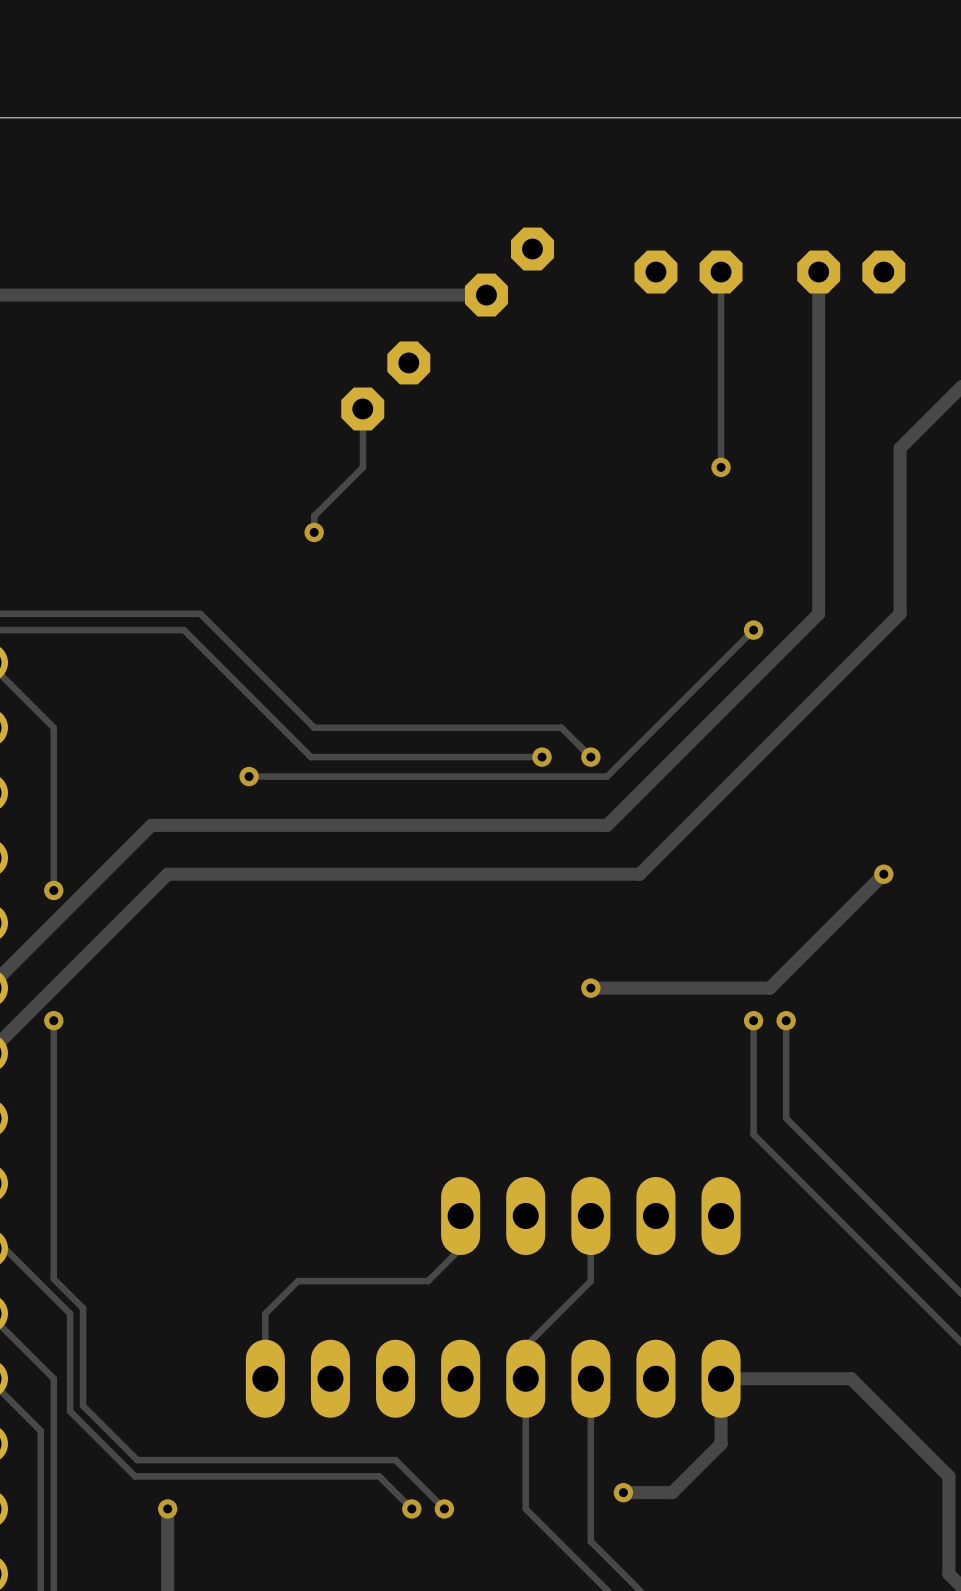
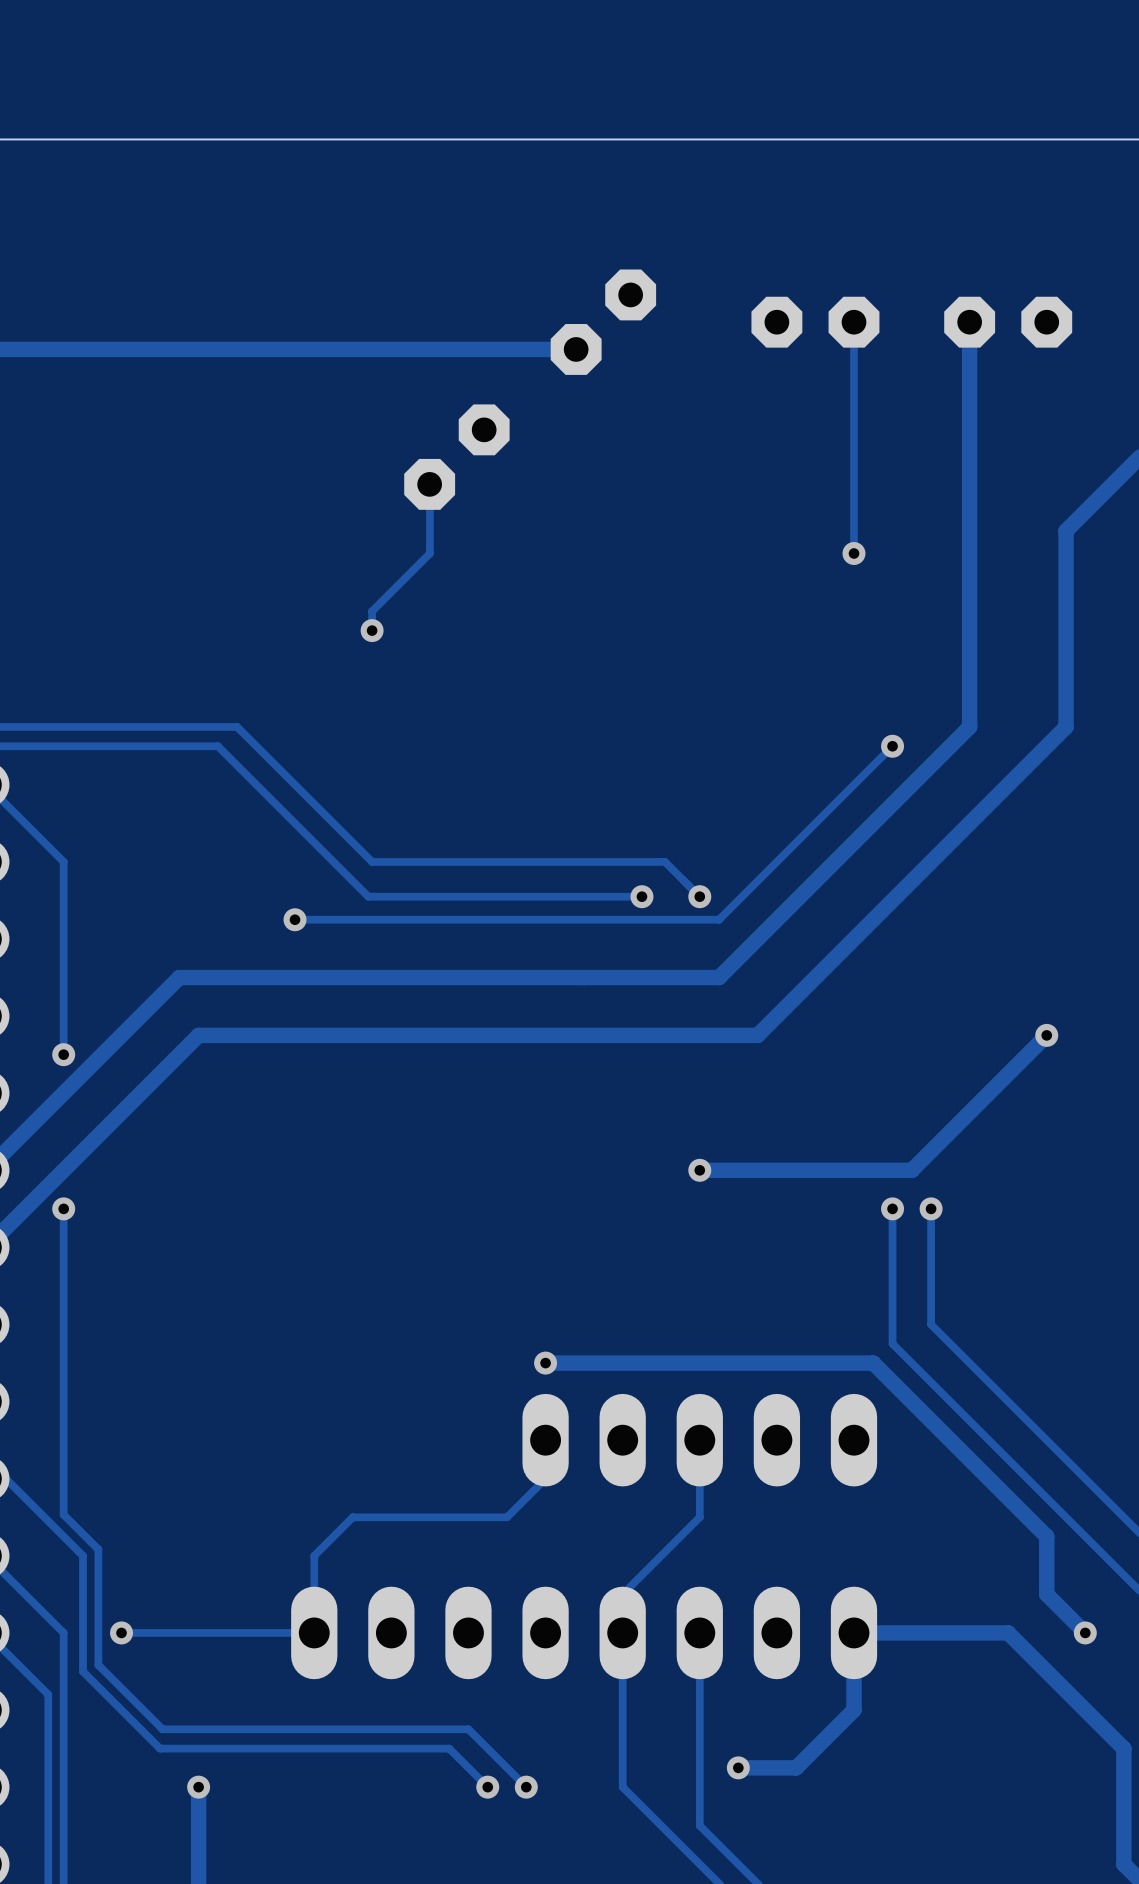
track: none -> (545, 1363) (873, 1363) (1046, 1536) (1046, 1594) (1085, 1632)
via: none -> (545, 1363)
via: none -> (121, 1632)
track: none -> (314, 1632) (121, 1632)
via: none -> (1085, 1632)

